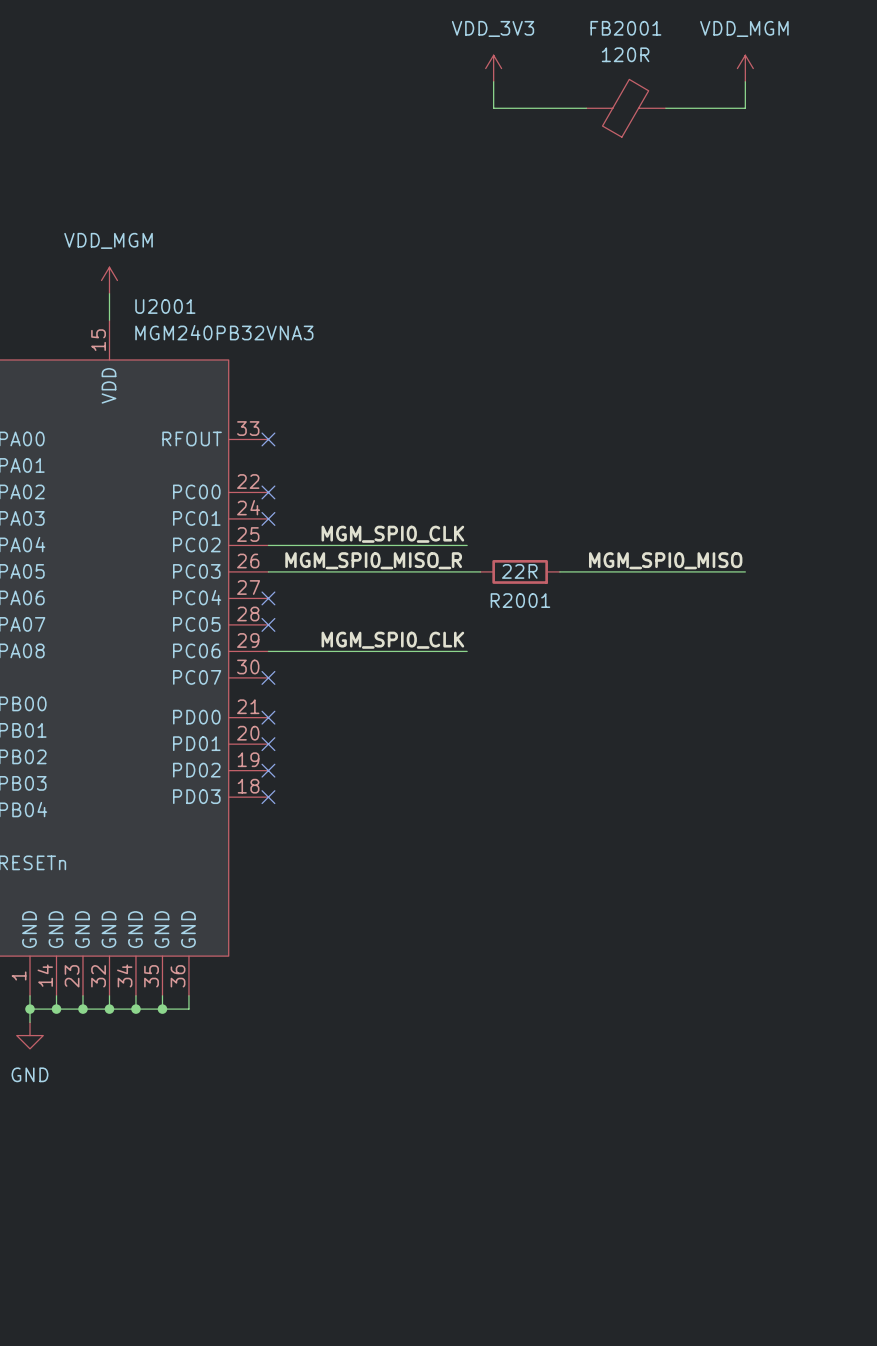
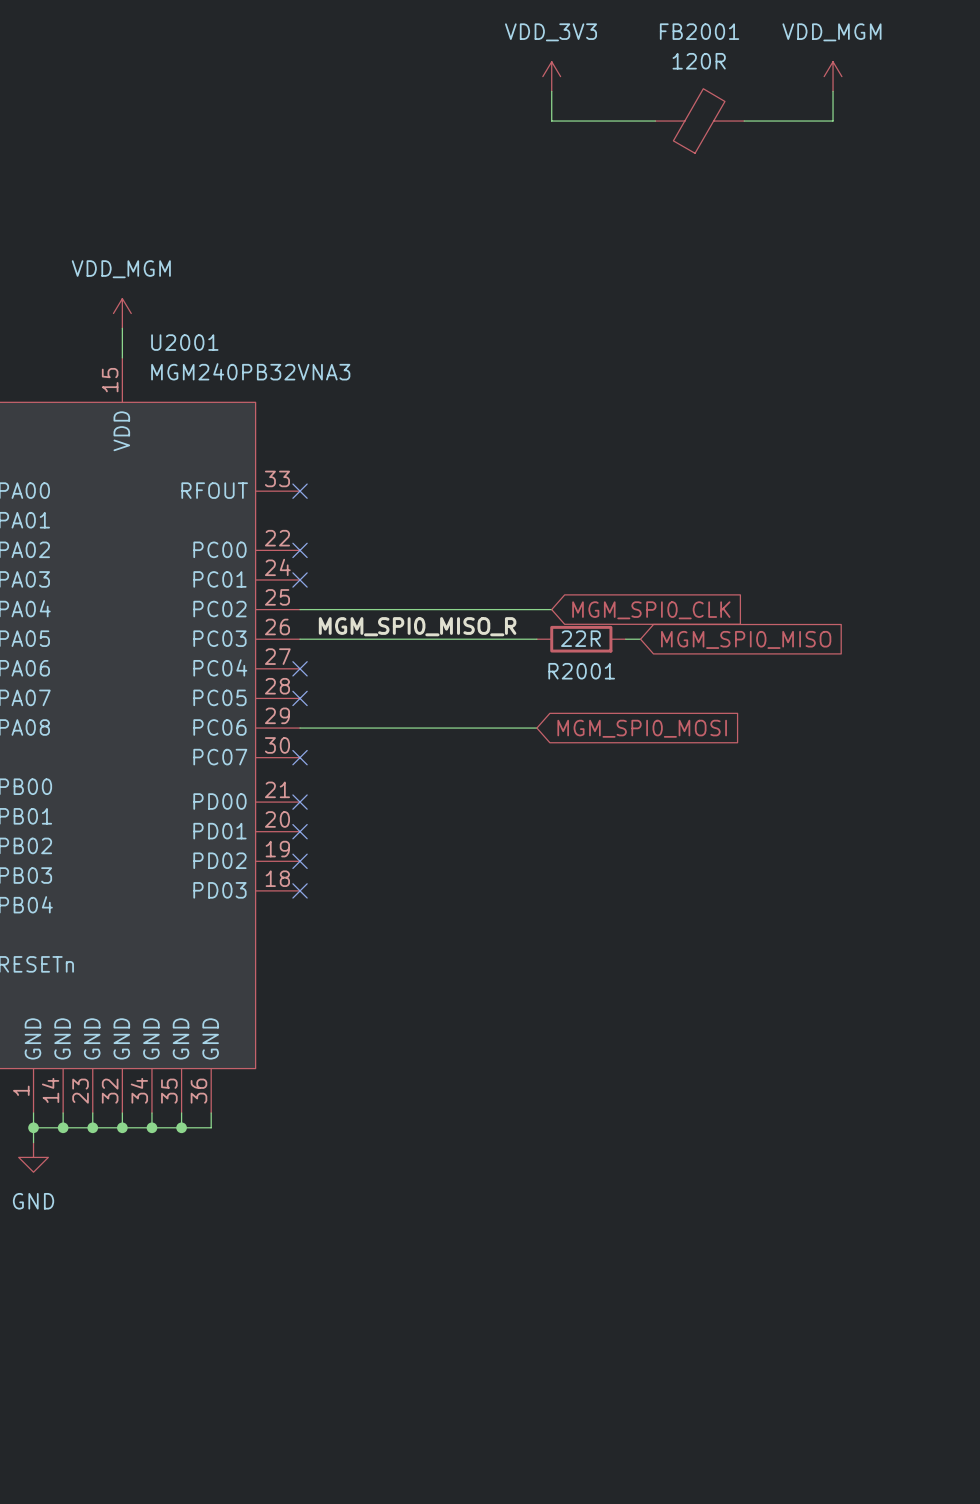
label: MGM_SPI0_CLK (392, 534) -> none
wire: none -> (522, 609) (551, 609)
global label: none -> MGM_SPI0_CLK (651, 610)
label: MGM_SPI0_MISO (665, 560) -> none
wire: (573, 571) (745, 571) -> none
global label: none -> MGM_SPI0_MISO (746, 639)
label: MGM_SPI0_CLK (392, 640) -> none
wire: none -> (522, 728) (536, 728)
global label: none -> MGM_SPI0_MOSI (642, 728)

